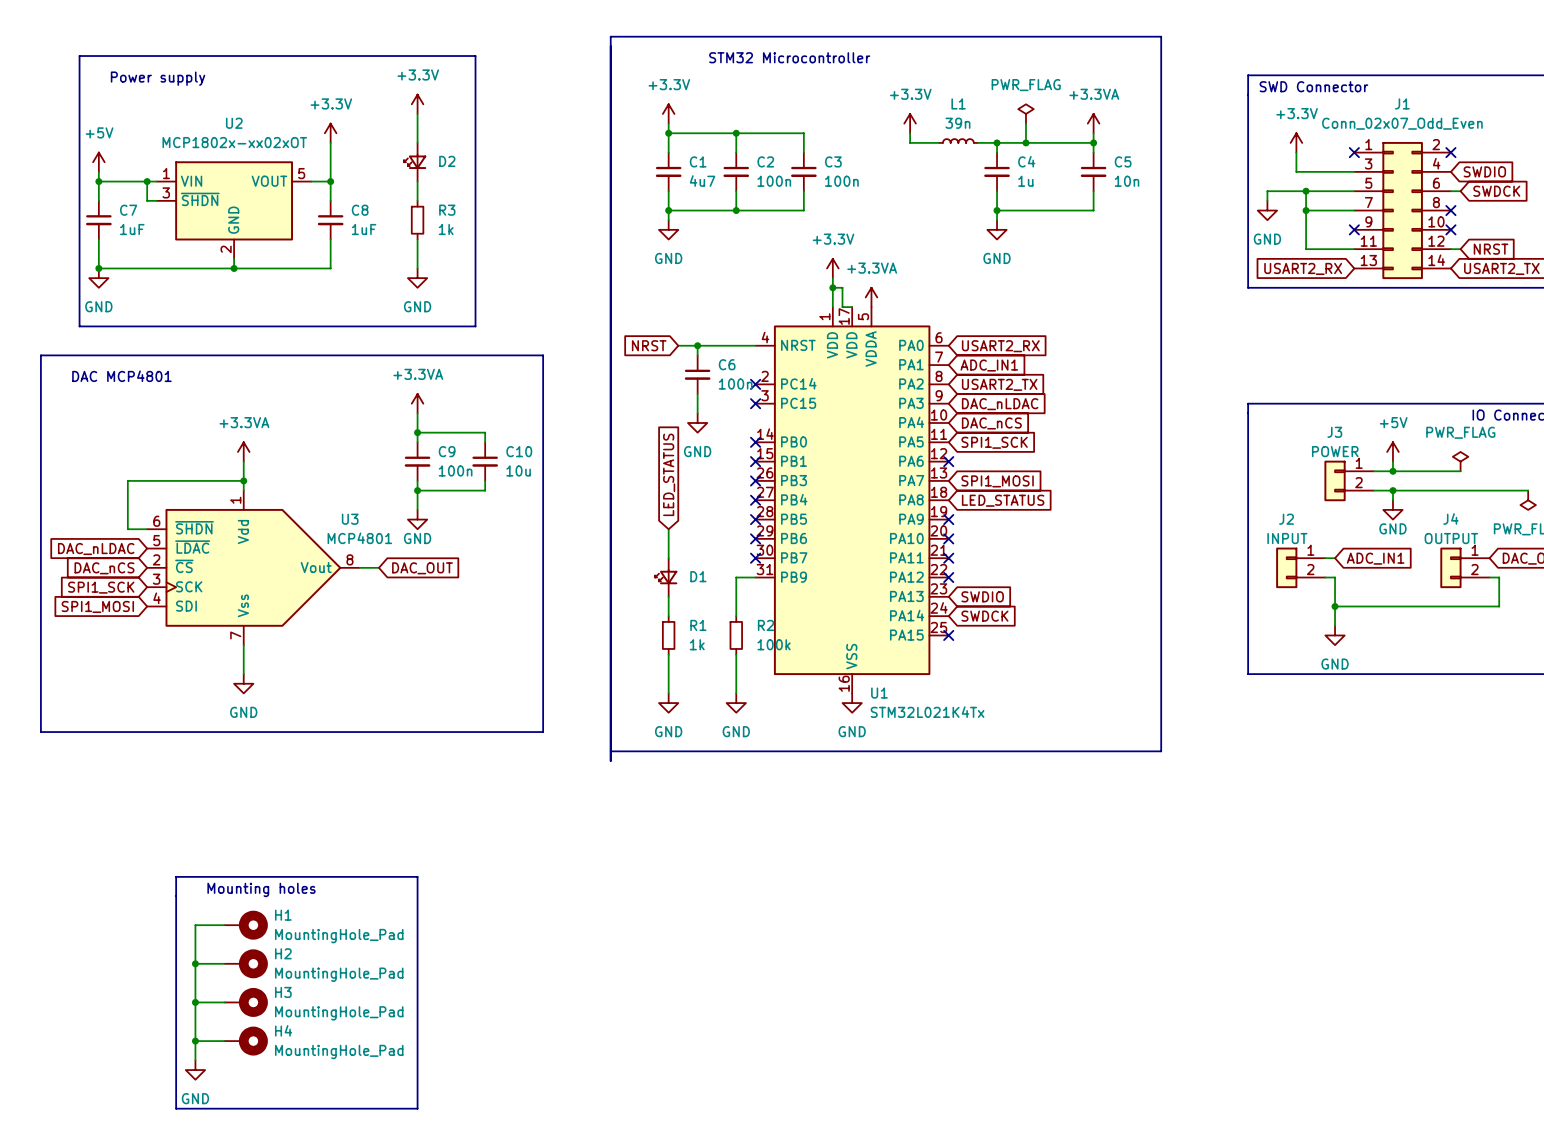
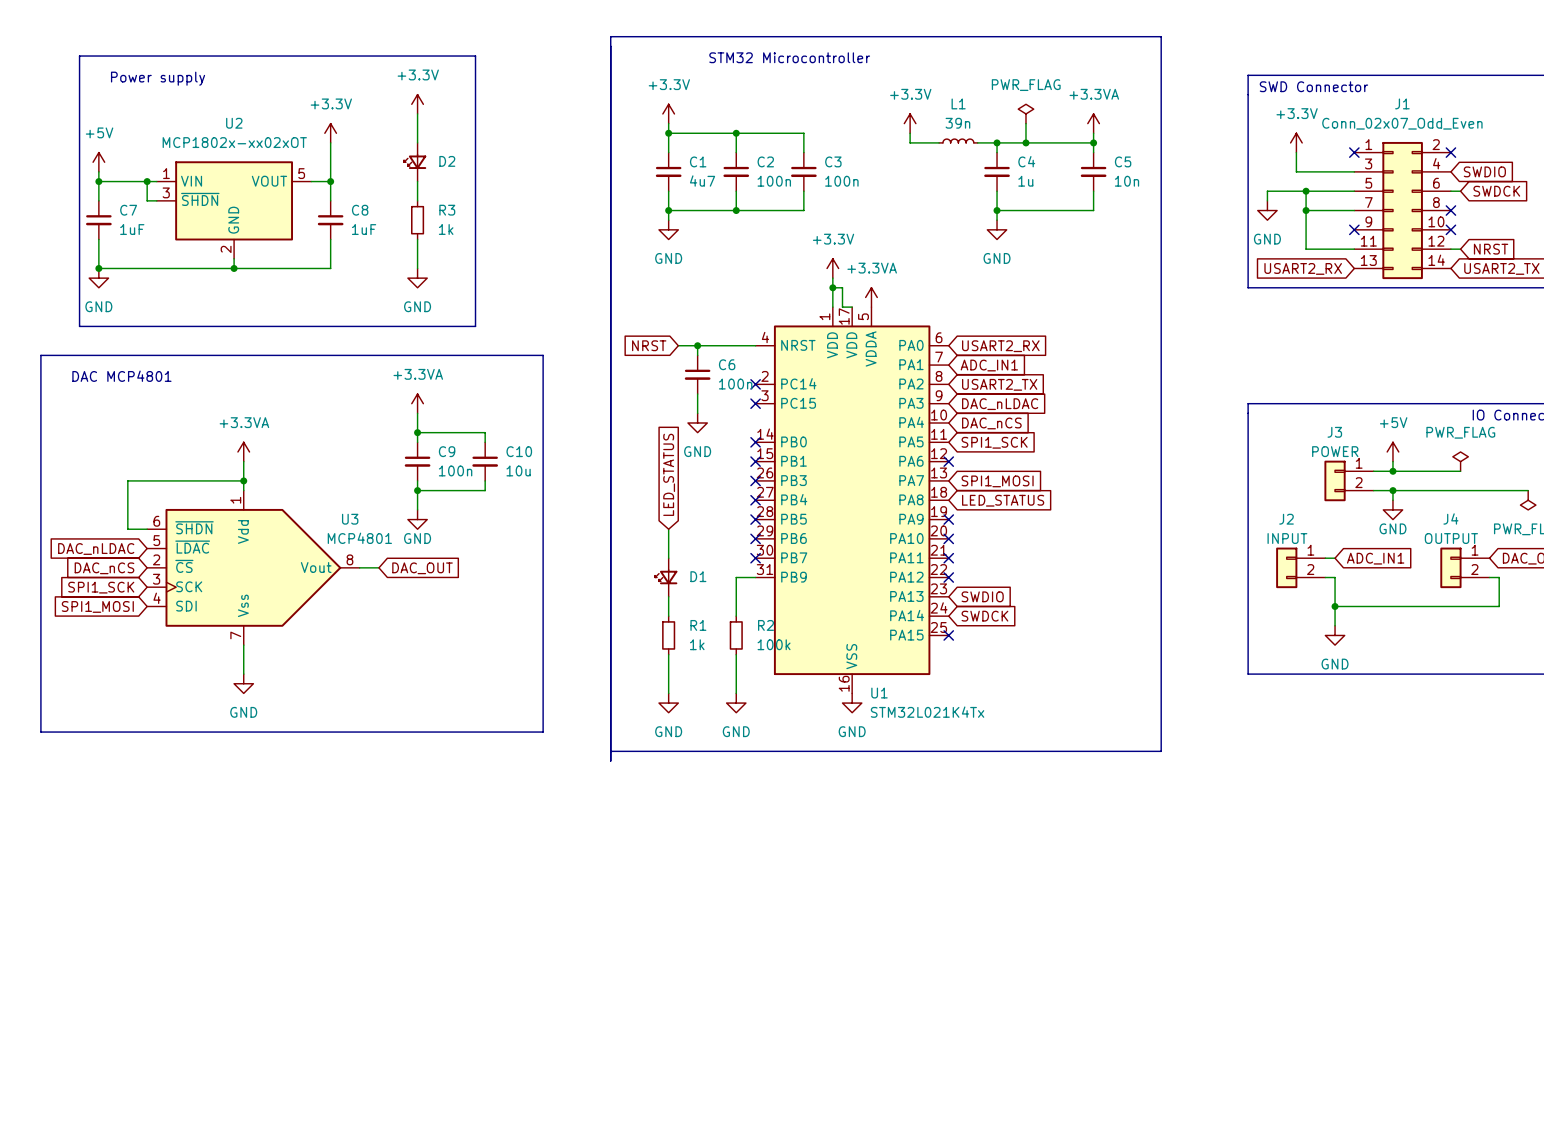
line: (176, 876) (417, 876) (417, 1108) (176, 1108) (176, 876) -> none
text: Mounting holes (261, 889) -> none
wire: (224, 925) (195, 925) (195, 1060) -> none
H1: MountingHole_Pad (246, 925) -> none
wire: (195, 963) (224, 963) -> none
junction: (195, 963) -> none
H2: MountingHole_Pad (246, 963) -> none
wire: (195, 1002) (224, 1002) -> none
junction: (195, 1002) -> none
H3: MountingHole_Pad (246, 1002) -> none
wire: (195, 1041) (224, 1041) -> none
junction: (195, 1041) -> none
H4: MountingHole_Pad (246, 1041) -> none
power symbol: GND (195, 1070) -> none

